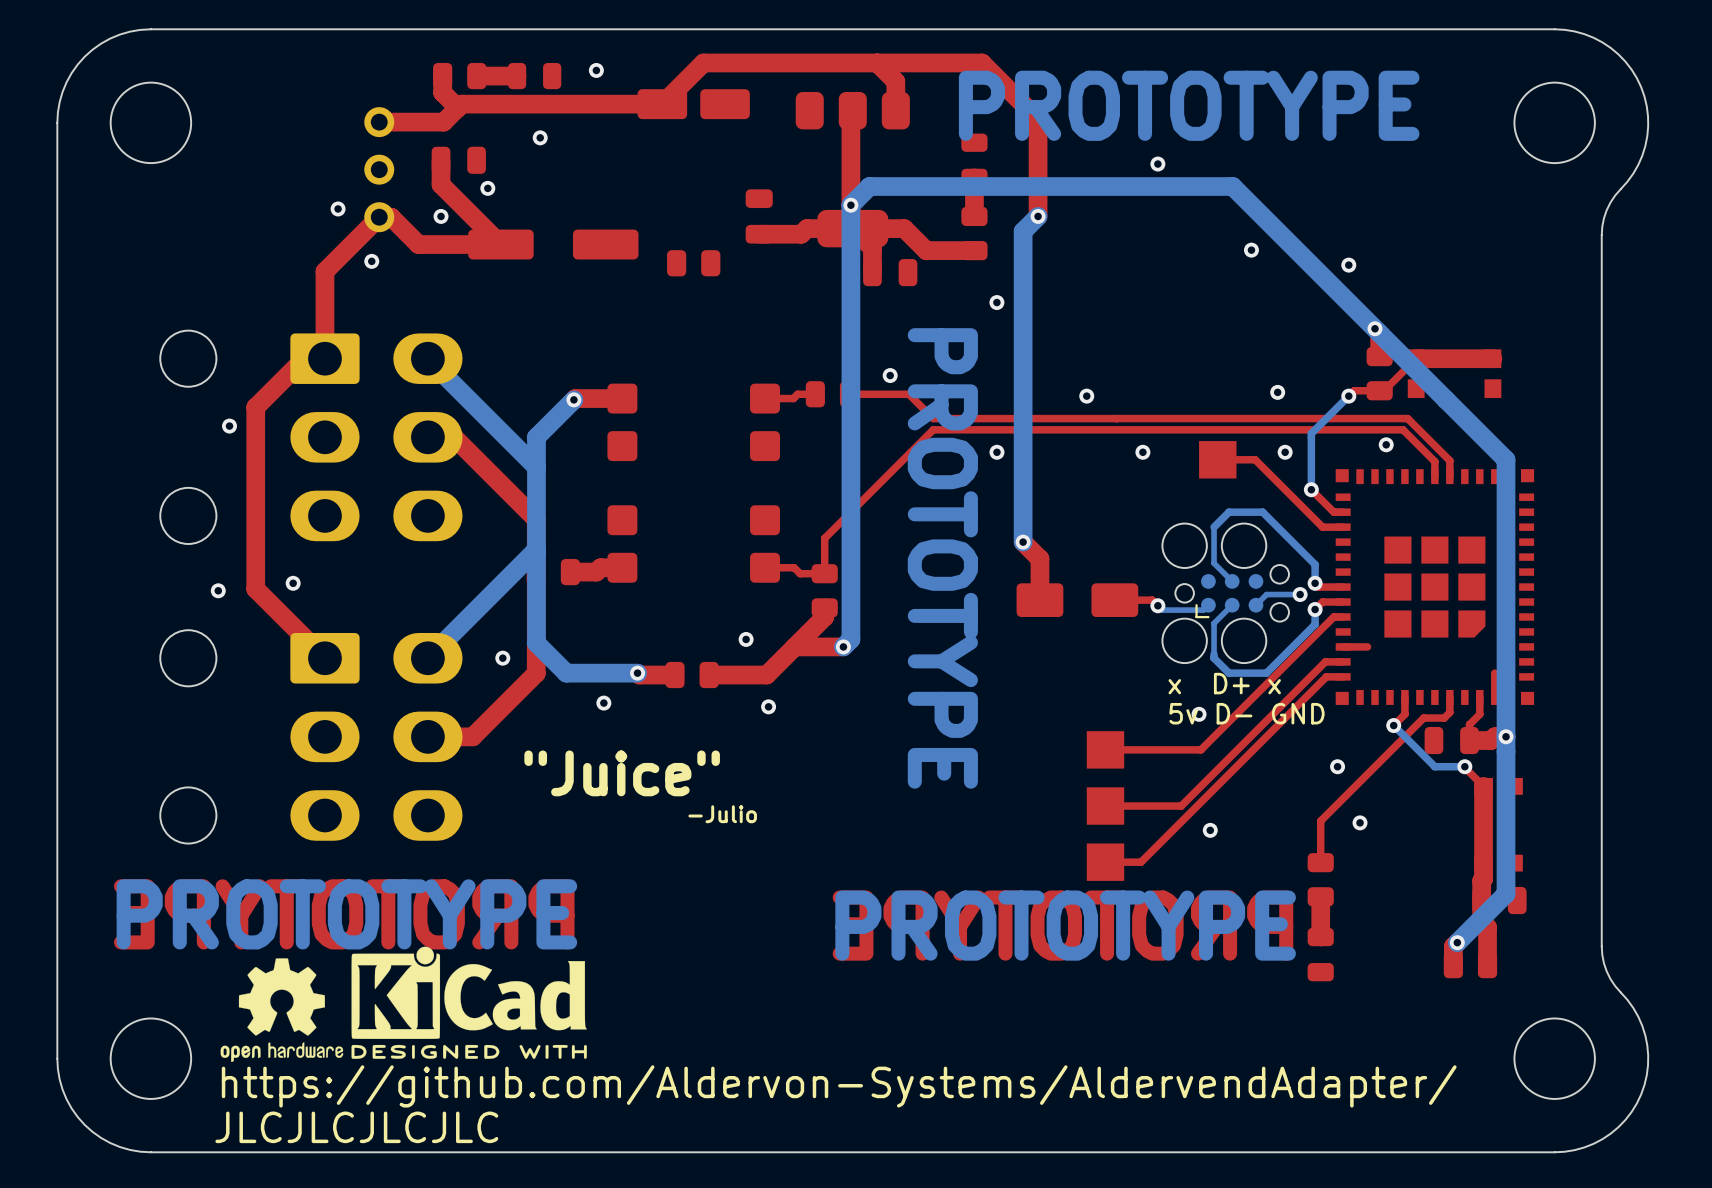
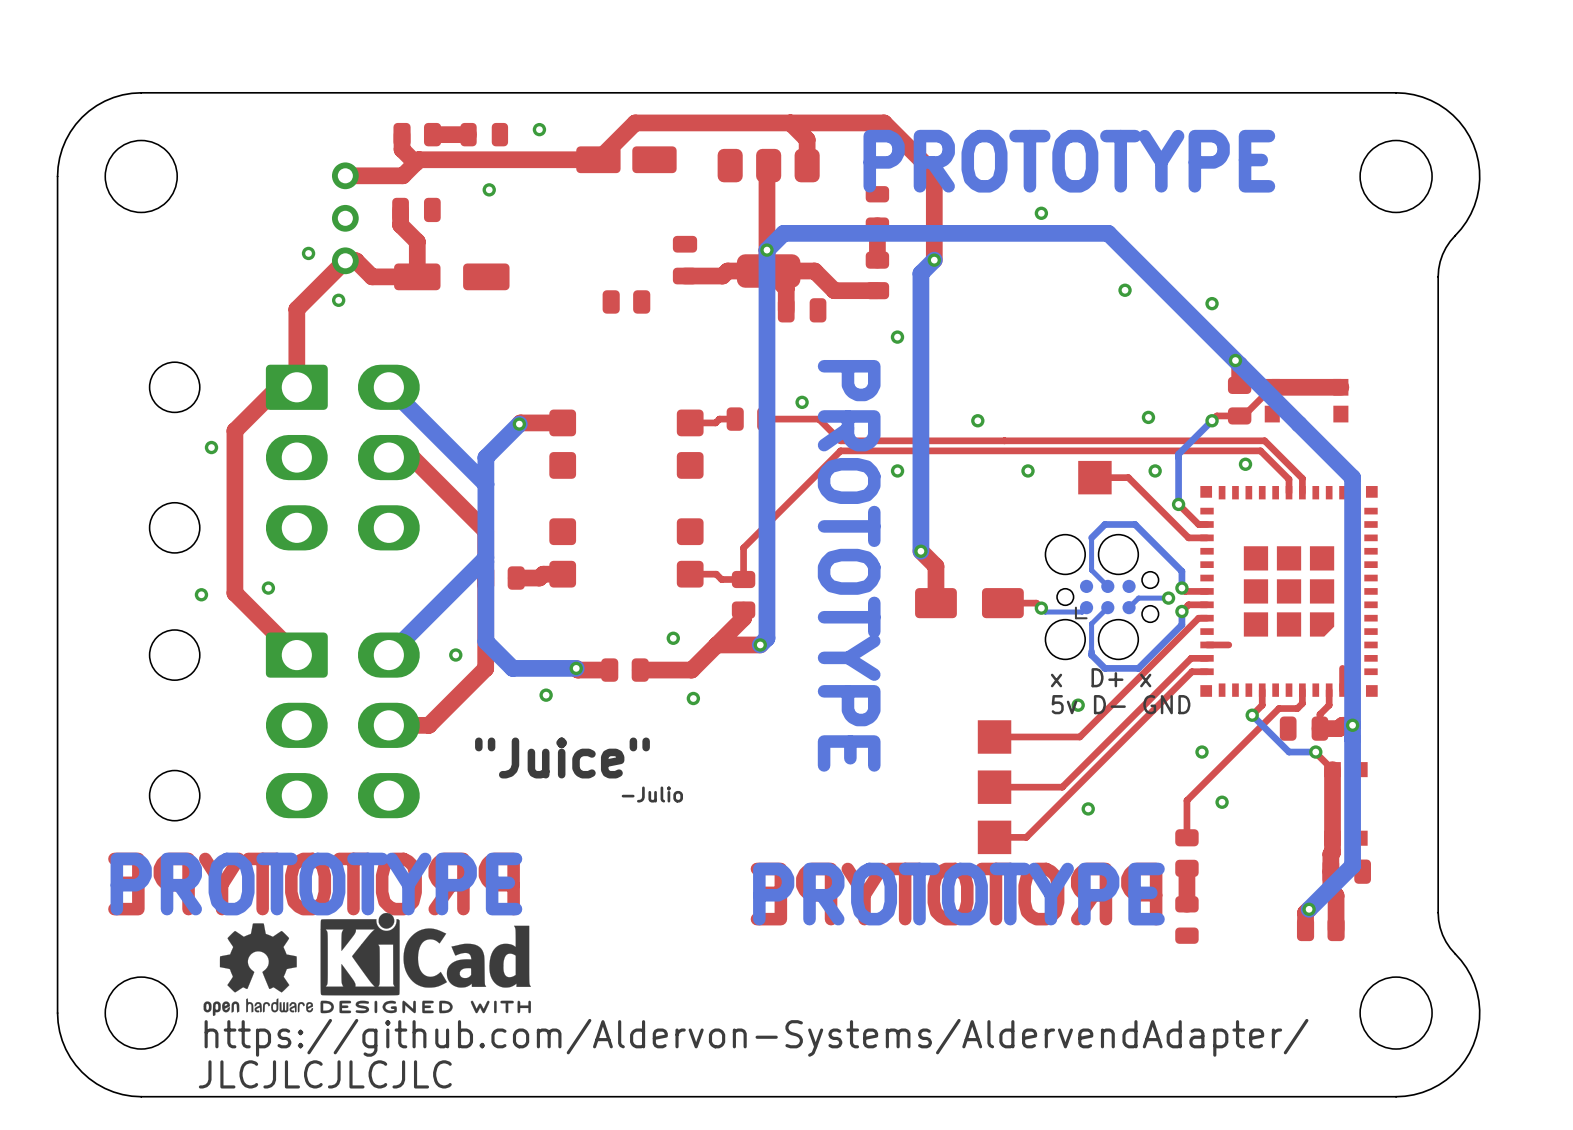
top track: (441, 177) (441, 184) (500, 244) (418, 244) (409, 235) -> (400, 225) (417, 241) (417, 276) (372, 276)
via: (487, 188) -> none
via: (441, 216) -> none
part: none -> (451, 276)
part: (553, 244) -> none

